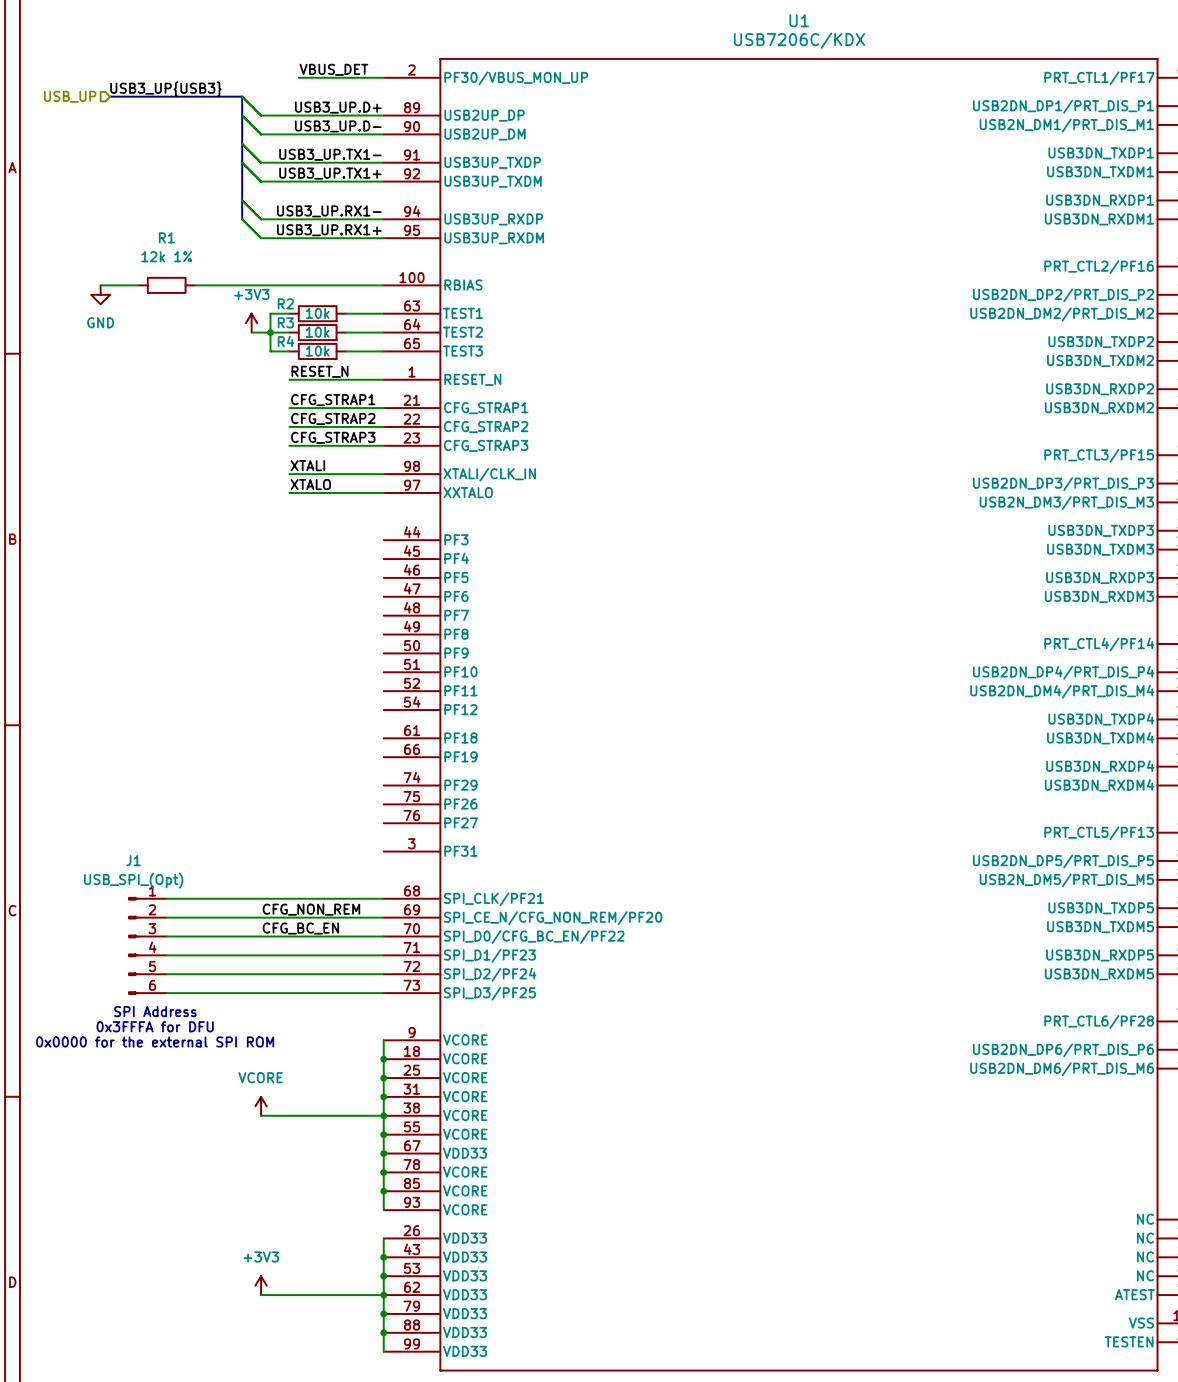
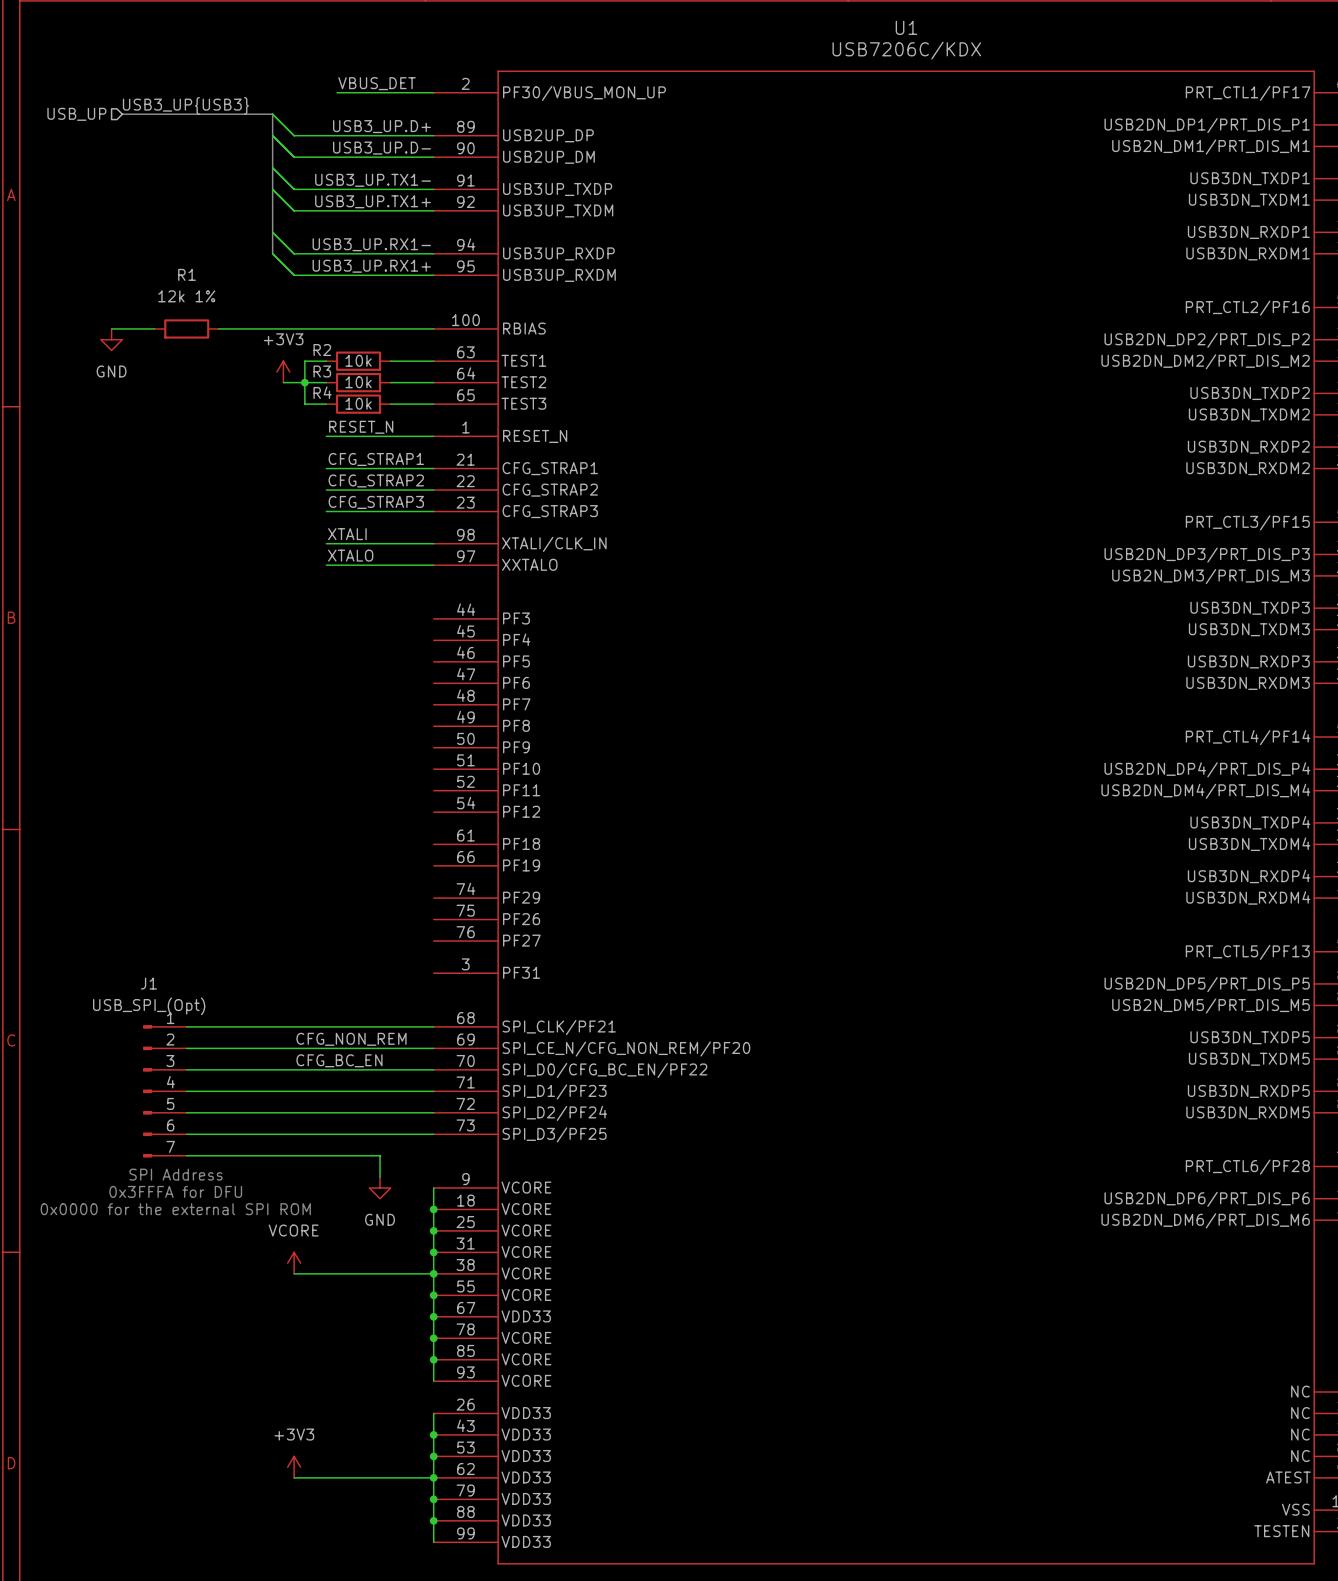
J1 symbol: [128, 897, 167, 995] -> [143, 1025, 187, 1158]
text: SPI Address (155, 1011) -> none
wire: none -> (186, 1155) (380, 1155) (380, 1177)
text: 0x3FFFA for DFU (155, 1026) -> SPI Address (176, 1174)
power symbol: none -> GND (380, 1187)
text: 0x0000 for the external SPI ROM (155, 1041) -> 0x3FFFA for DFU (175, 1191)
text: none -> 0x0000 for the external SPI ROM (175, 1209)

